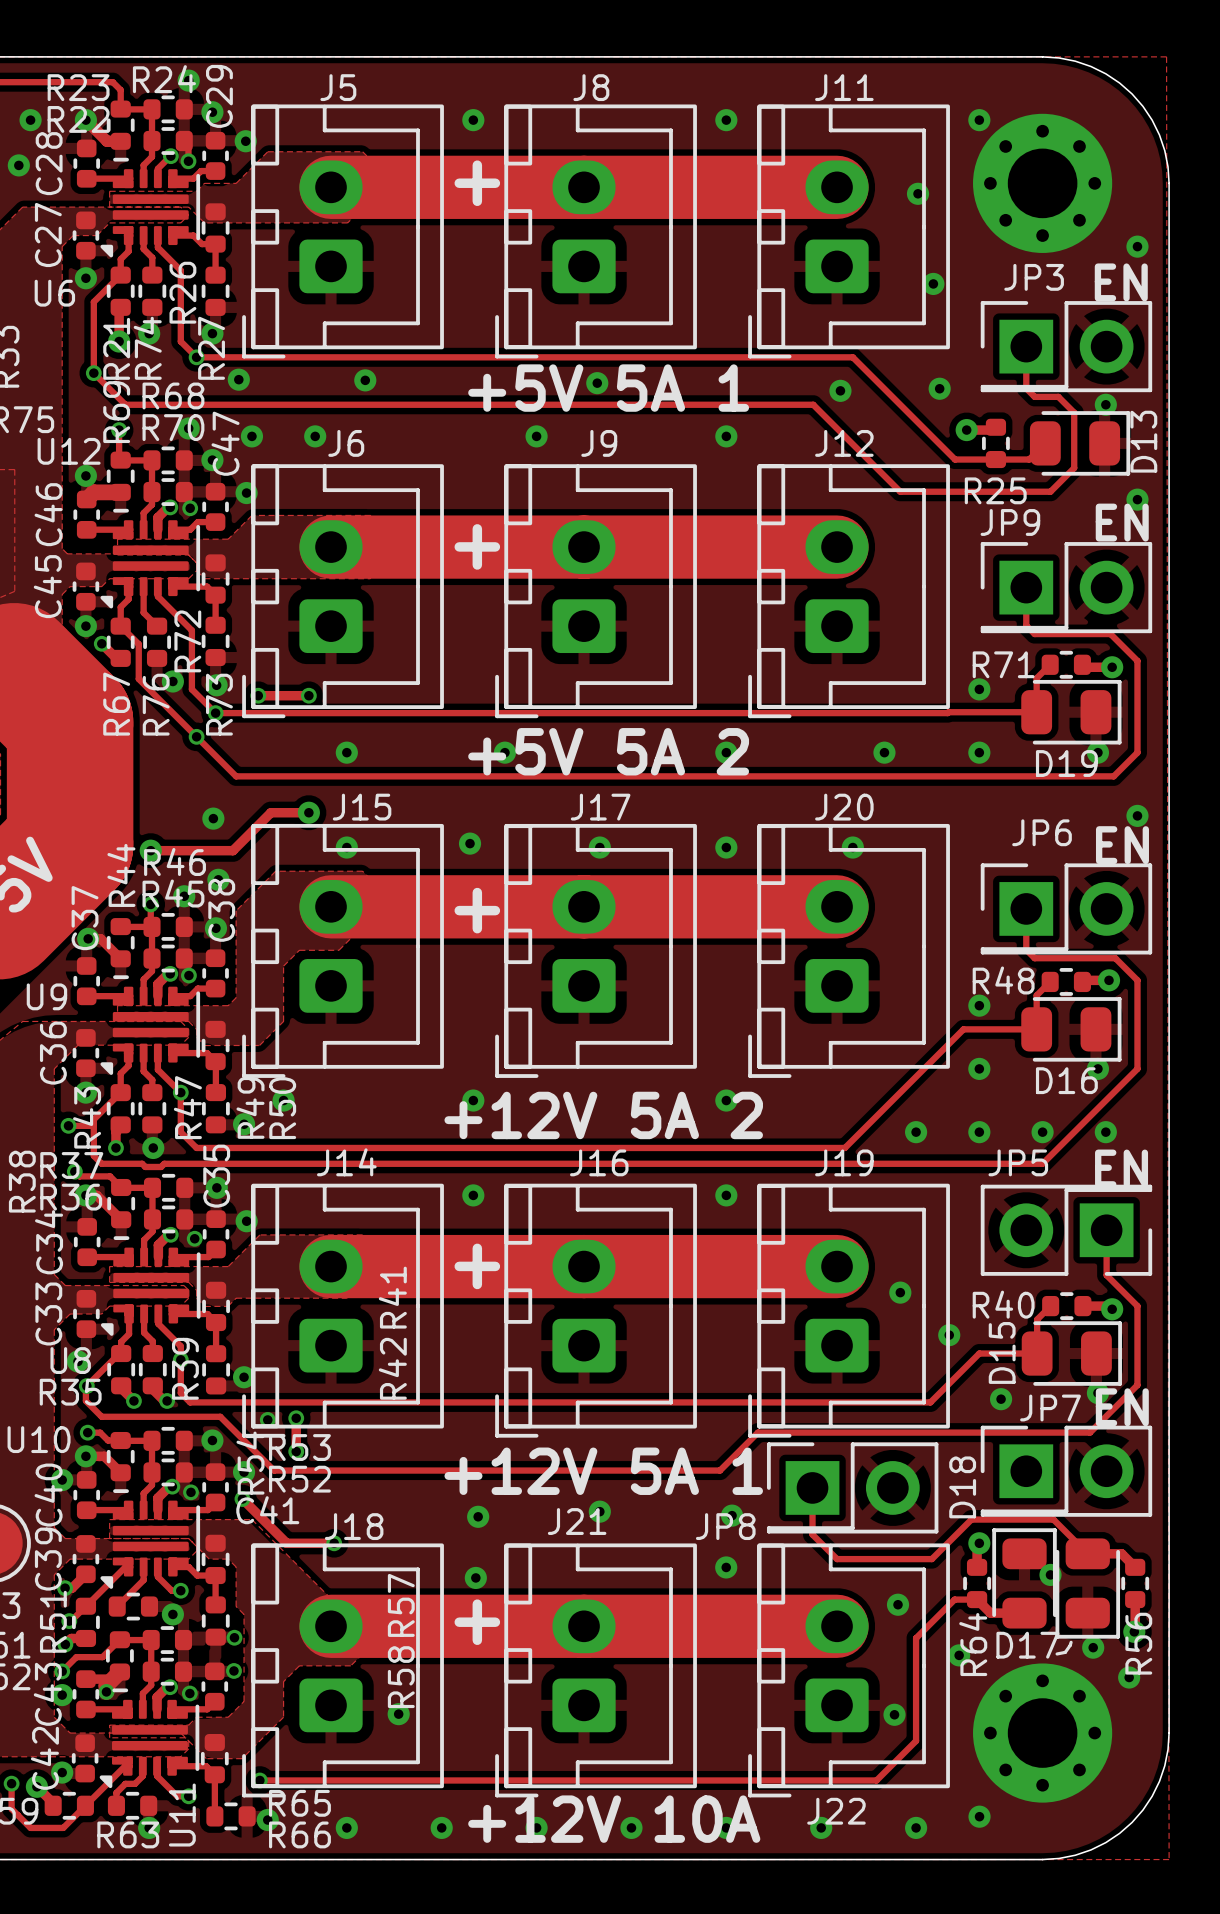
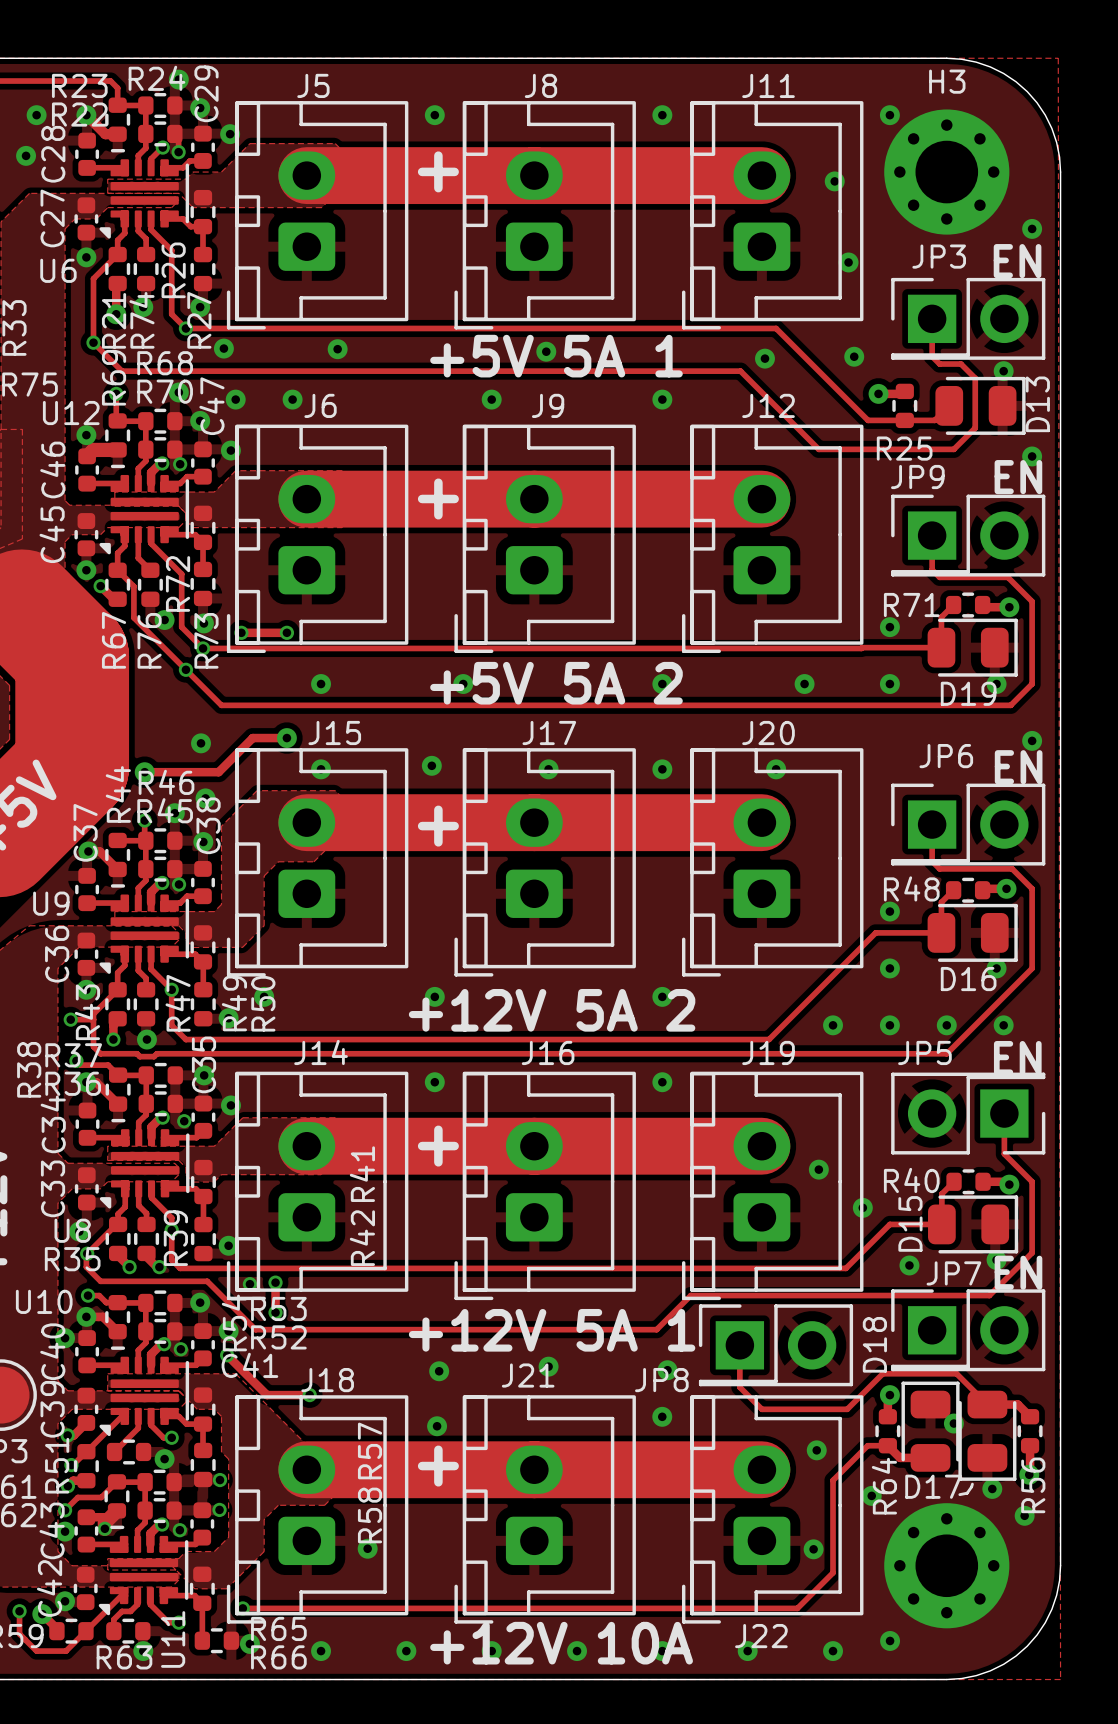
H3 name: none -> H3 (947, 81)

